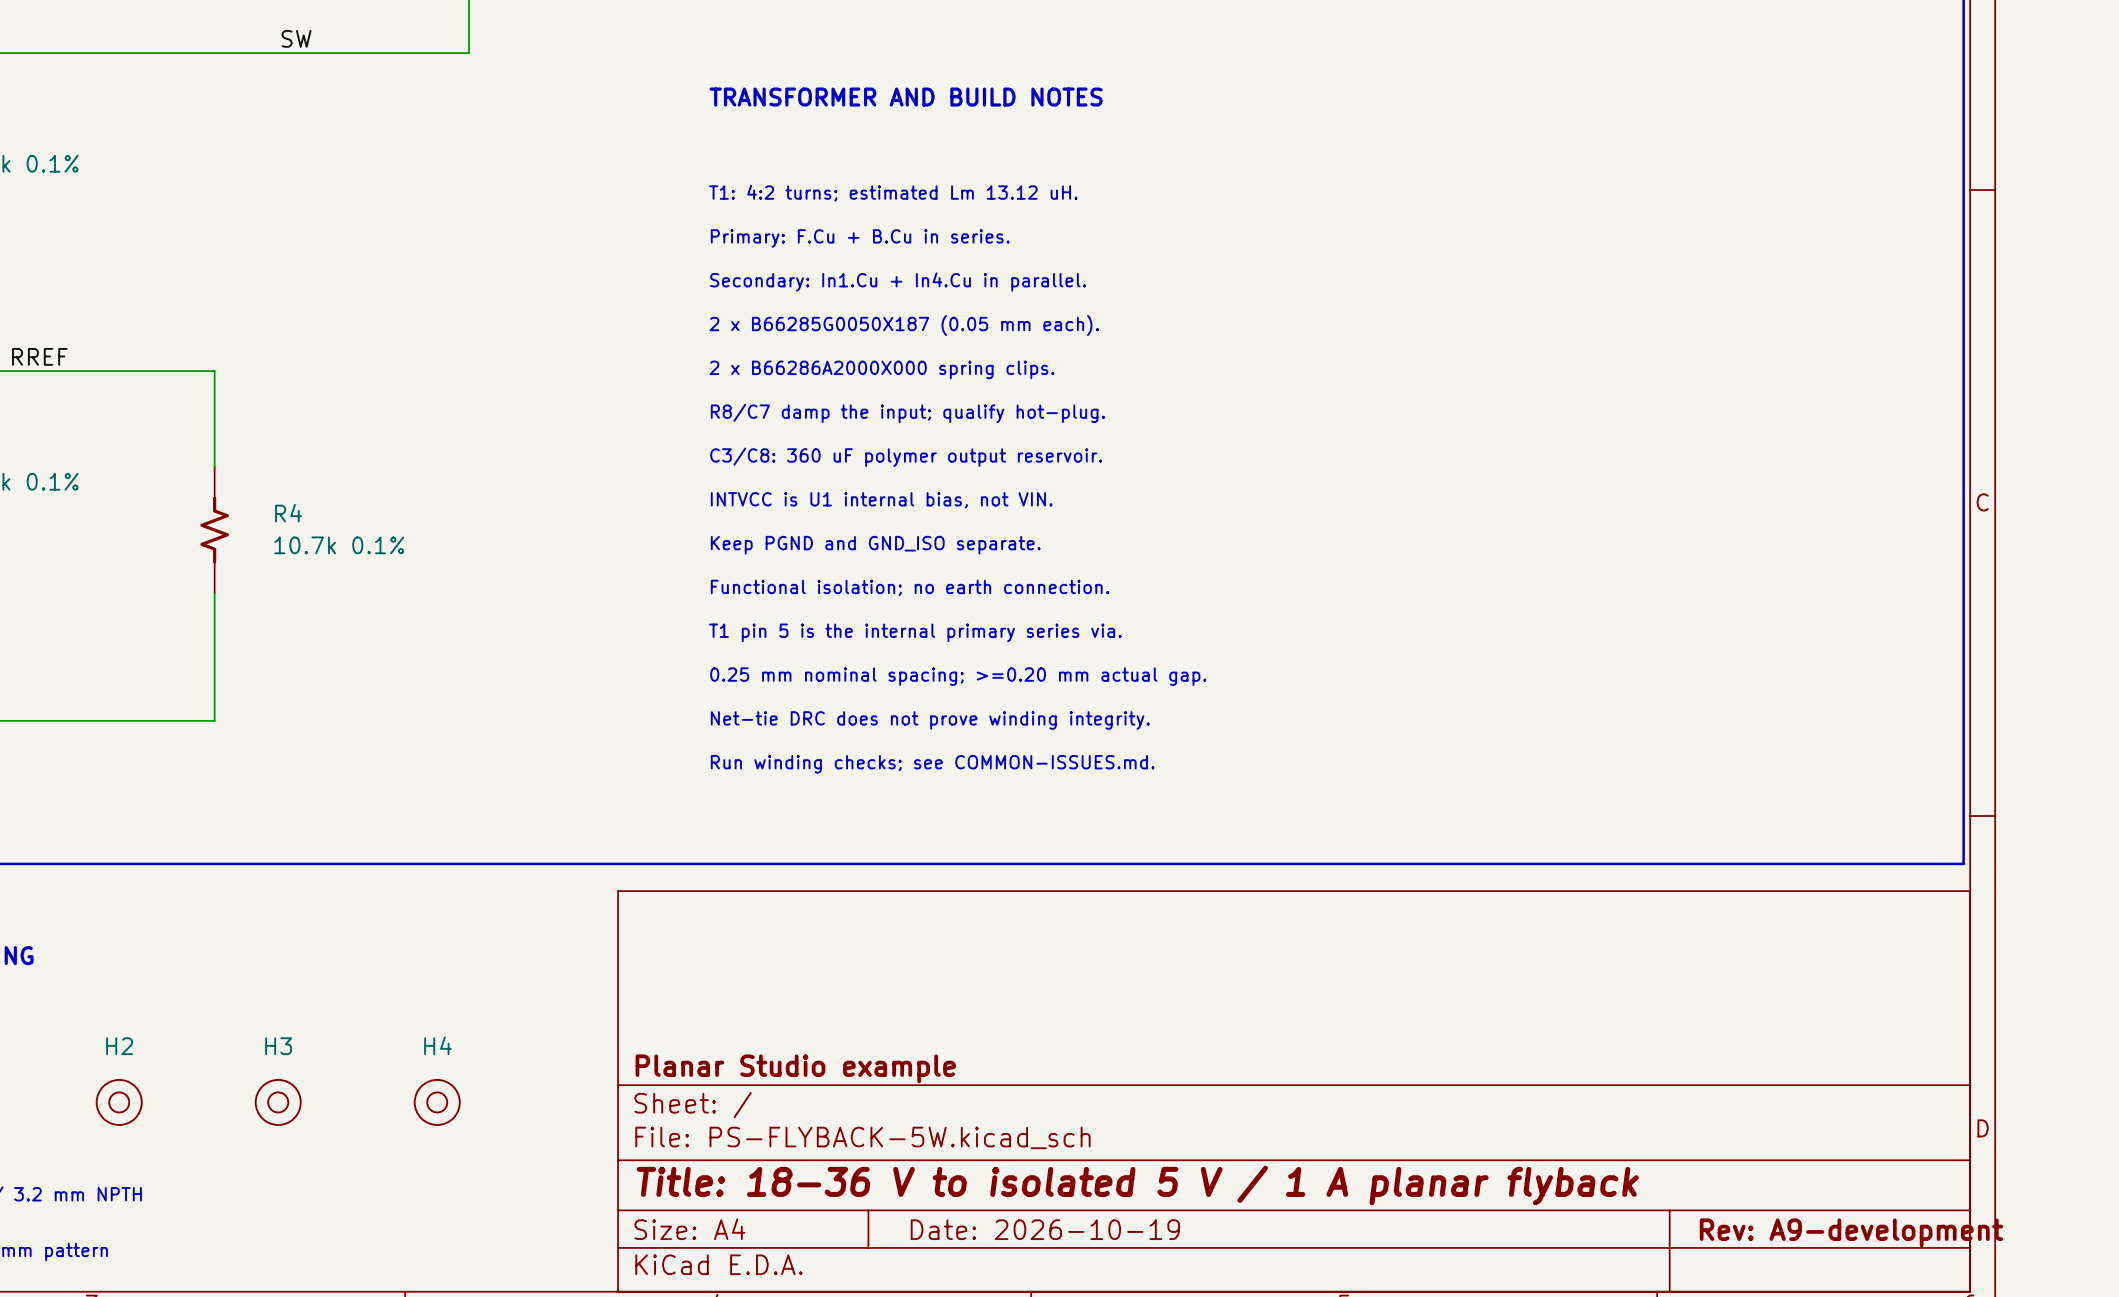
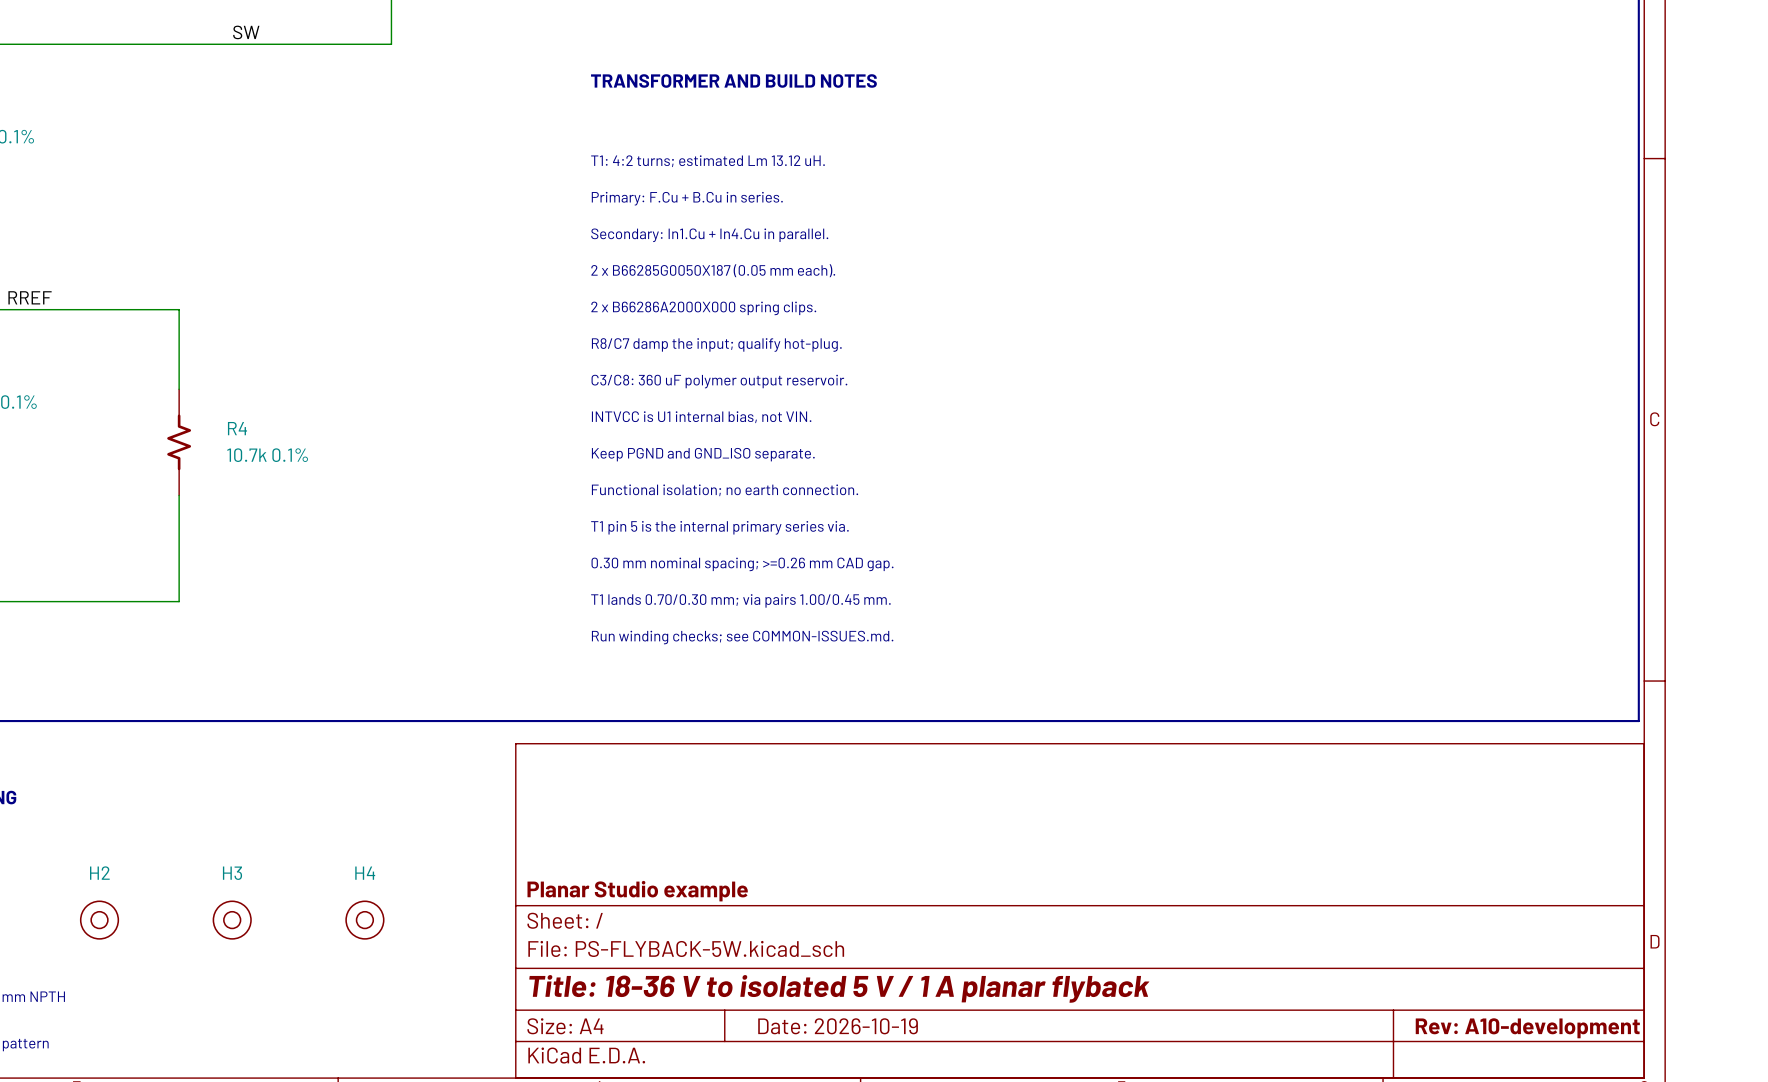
text: 0.25 mm nominal spacing; >=0.20 mm actual gap. (958, 676) -> 0.30 mm nominal spacing; >=0.26 mm CAD gap. (742, 564)
text: Net-tie DRC does not prove winding integrity. (930, 720) -> T1 lands 0.70/0.30 mm; via pairs 1.00/0.45 mm. (740, 600)
title block: Rev: A9-development (1851, 1232) -> Rev: A10-development (1527, 1028)

